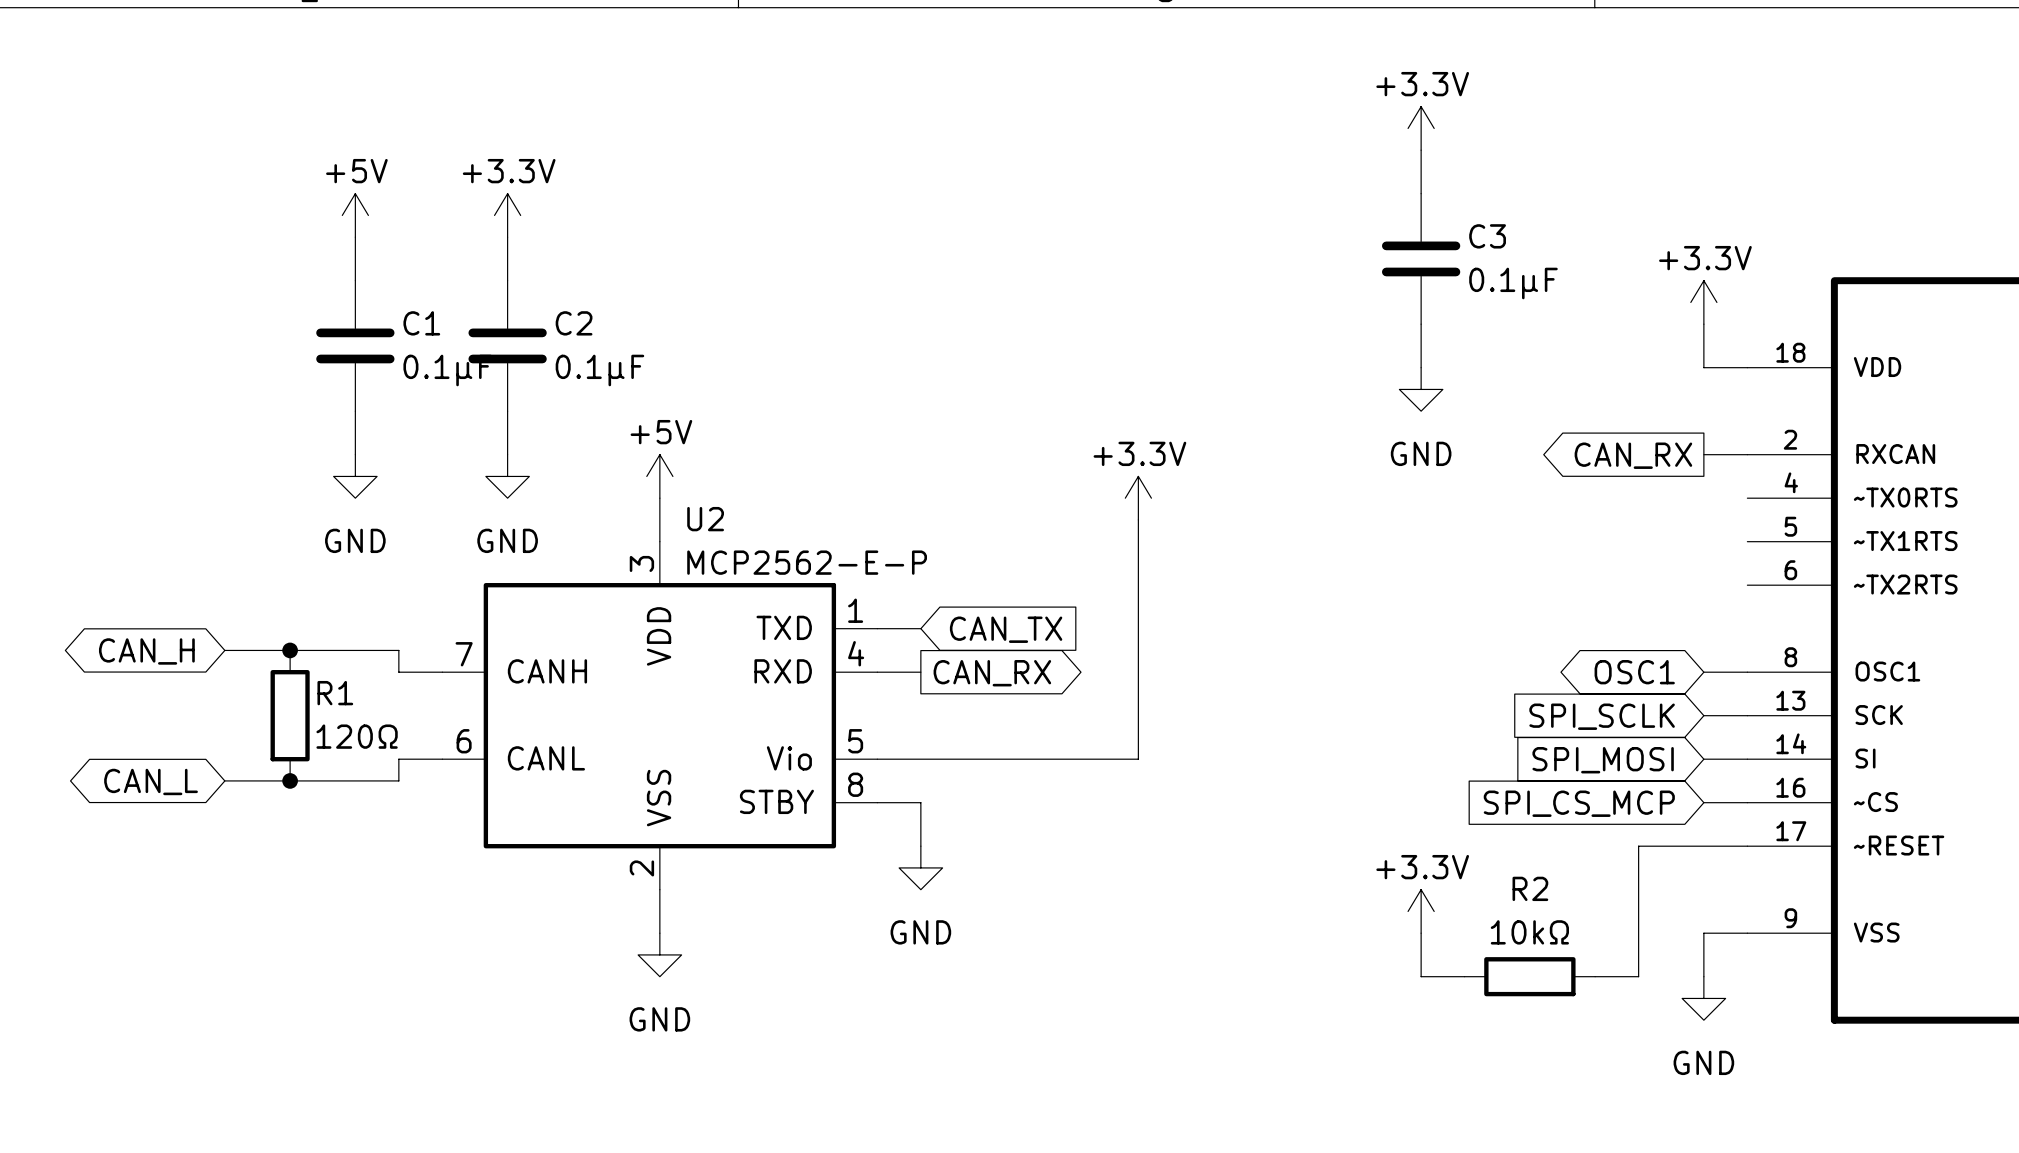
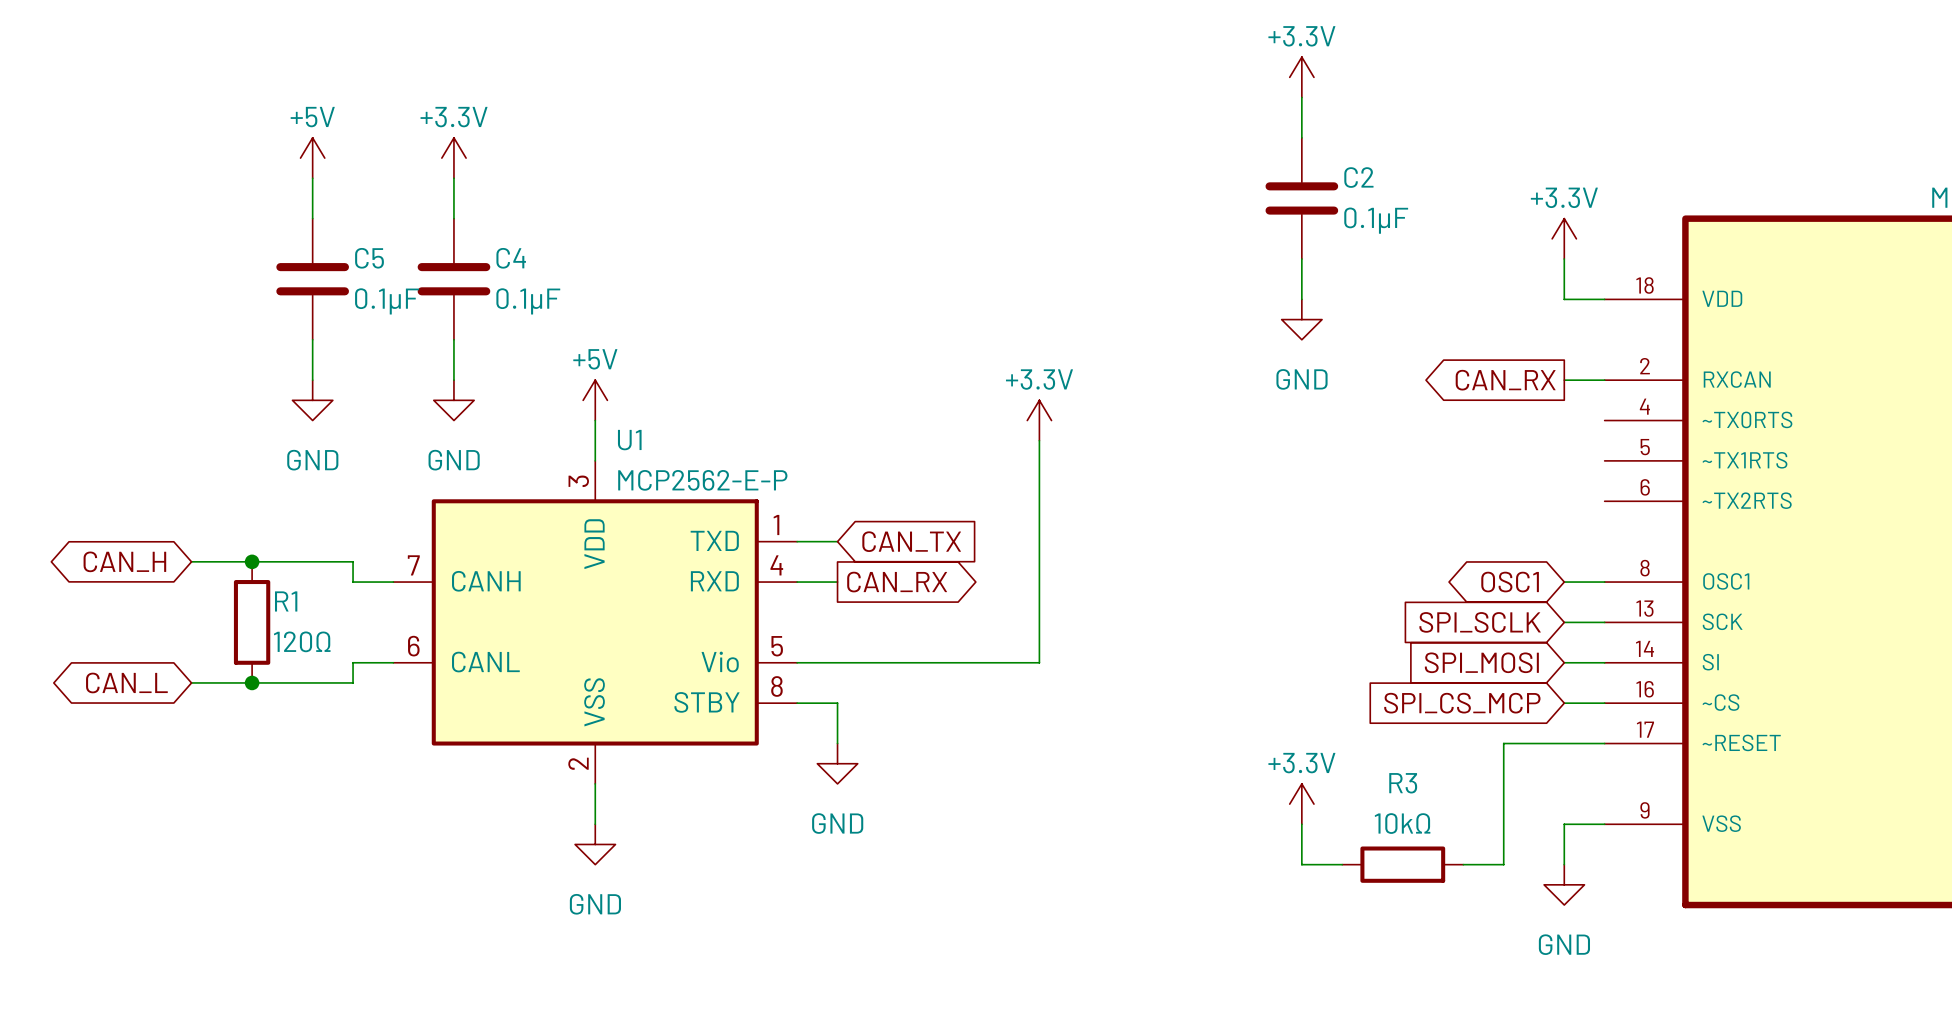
C3 name: C3 (1487, 236) -> C2 (1358, 177)
C1 name: C1 (421, 323) -> C5 (369, 258)
C2 name: C2 (574, 323) -> C4 (511, 258)
U2 name: U2 (705, 519) -> U1 (629, 440)
R2 name: R2 (1530, 888) -> R3 (1403, 783)

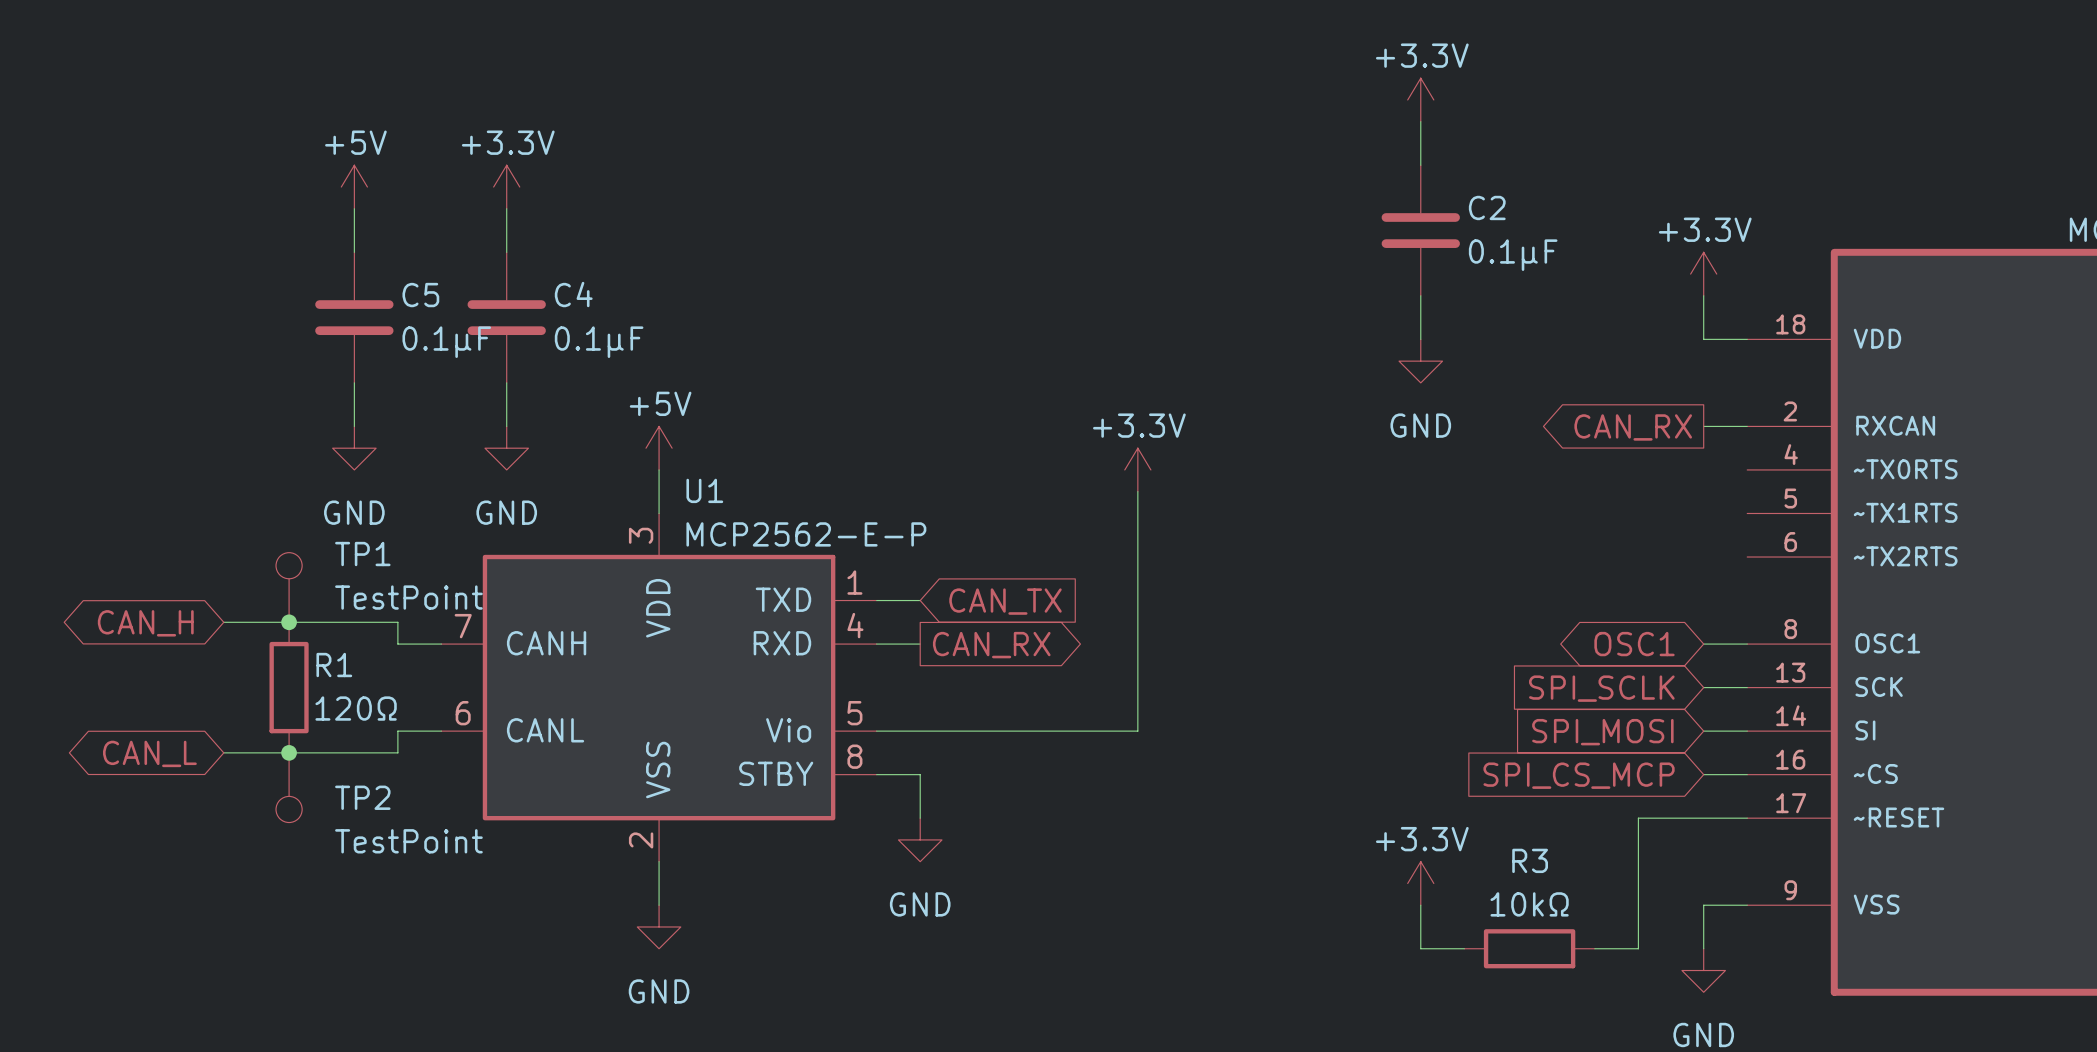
TP1: none -> TestPoint (289, 587)
TP2: none -> TestPoint (289, 787)

